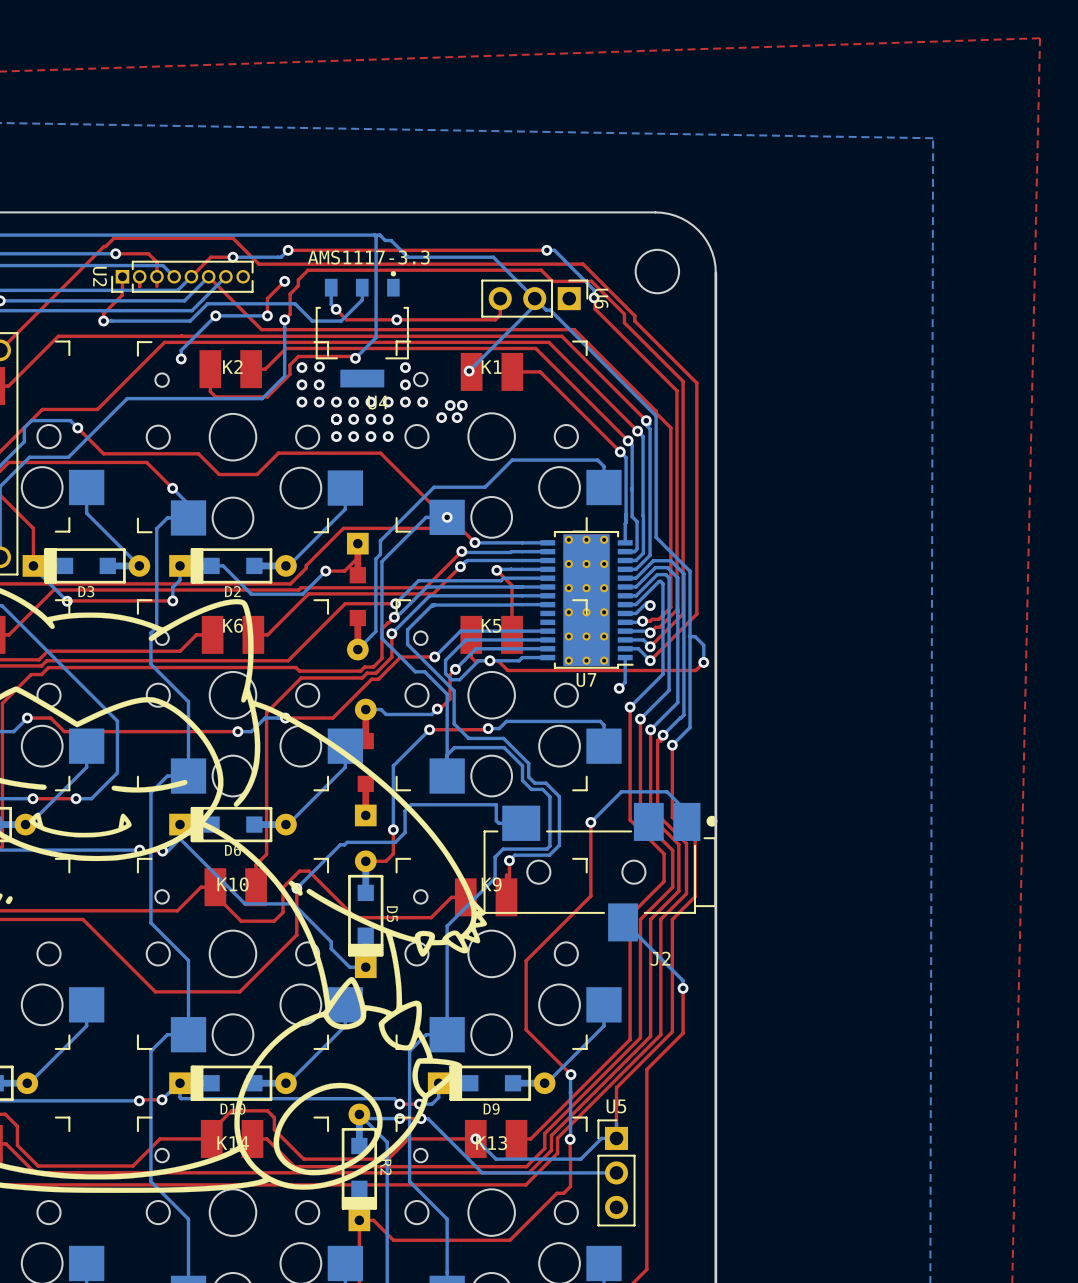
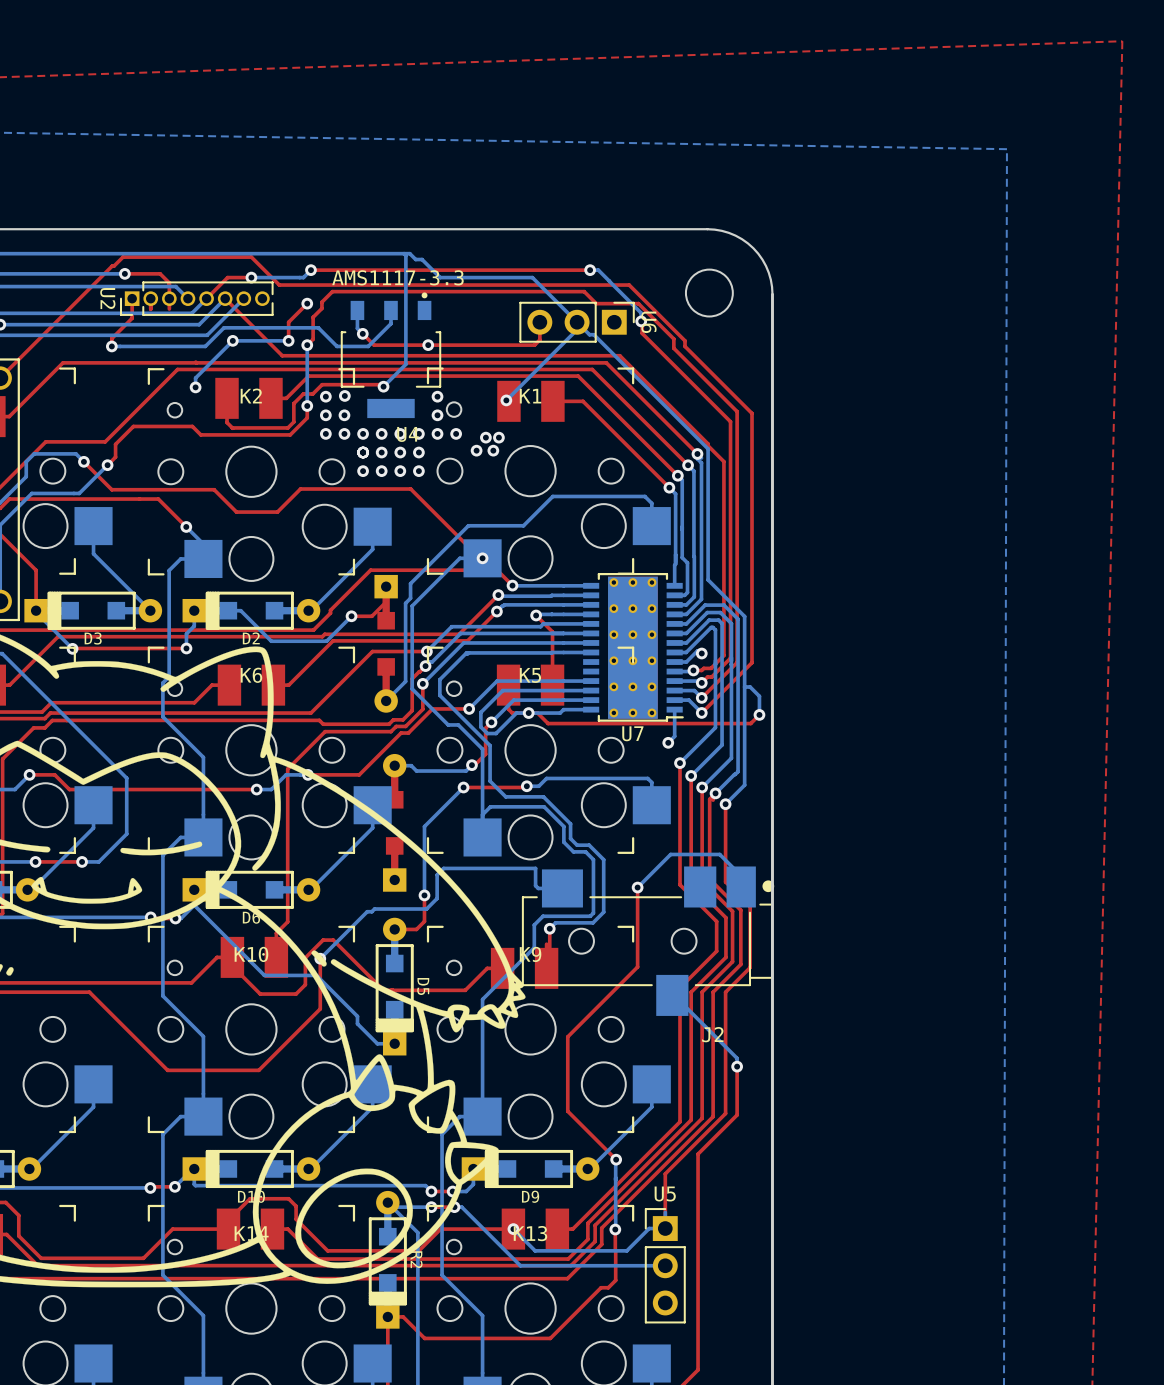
top track: (289, 365) (289, 374) (267, 396) (215, 396) -> (312, 393) (303, 393) (293, 403) (293, 422) (287, 427) (232, 427)
top track: none -> (307, 405) (307, 417) (290, 434) (200, 434) (192, 426) (133, 426) (115, 444) (115, 457) (107, 465)
bottom track: (284, 376) (262, 398) (127, 398) (68, 457) -> (107, 465) (79, 493) (73, 493)
via: none -> (307, 405)
via: none -> (107, 465)

